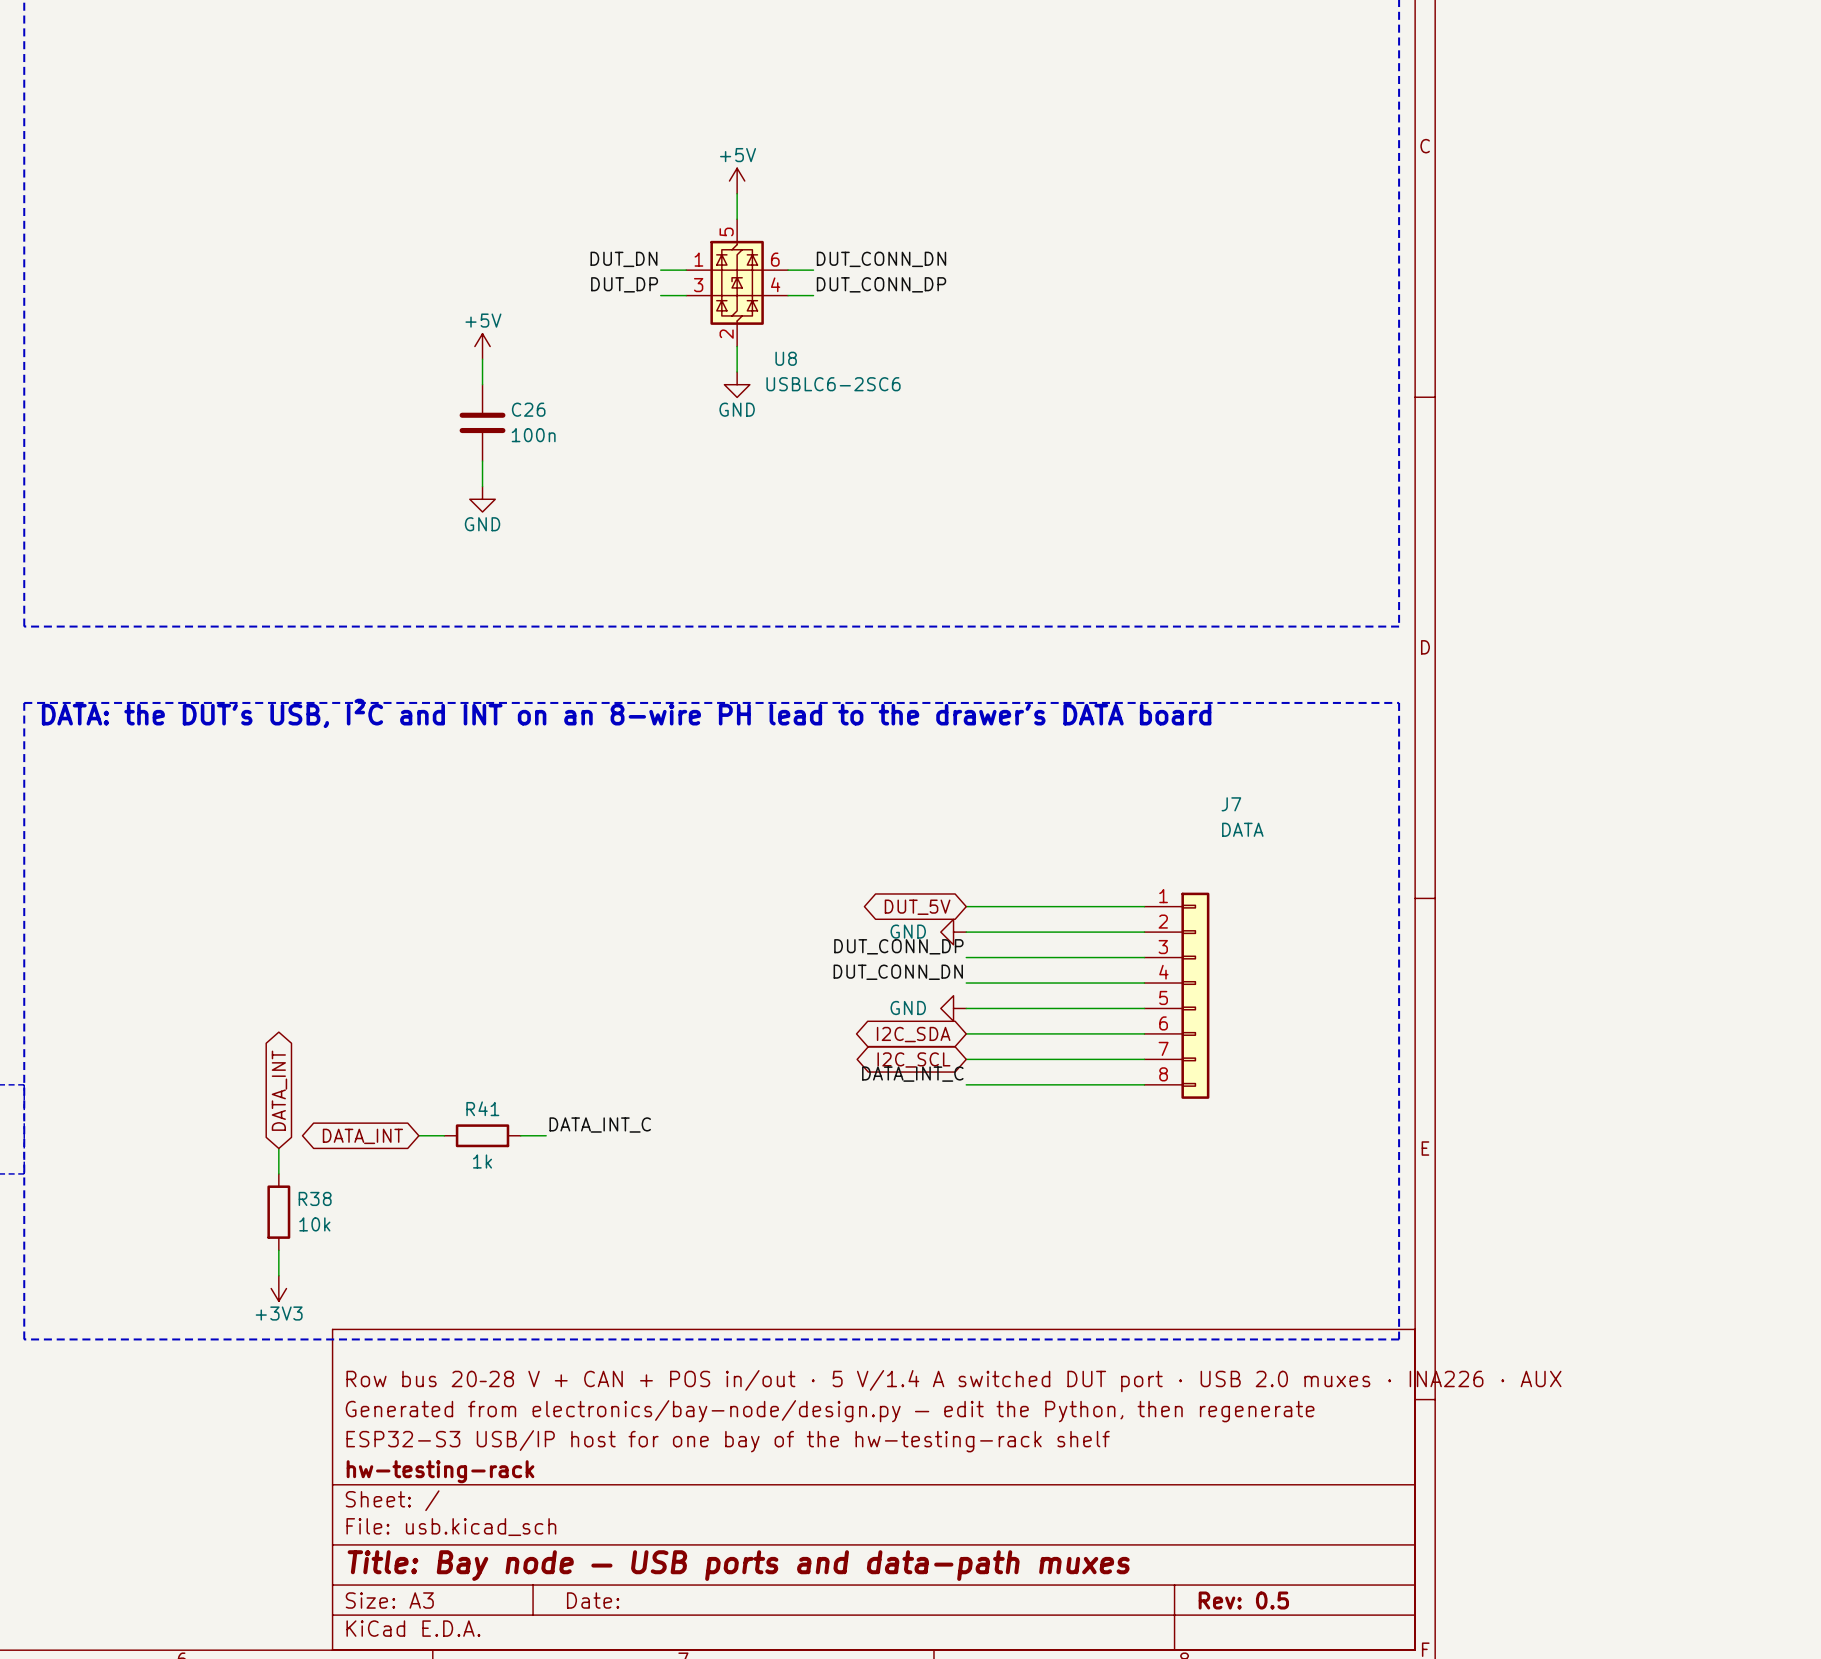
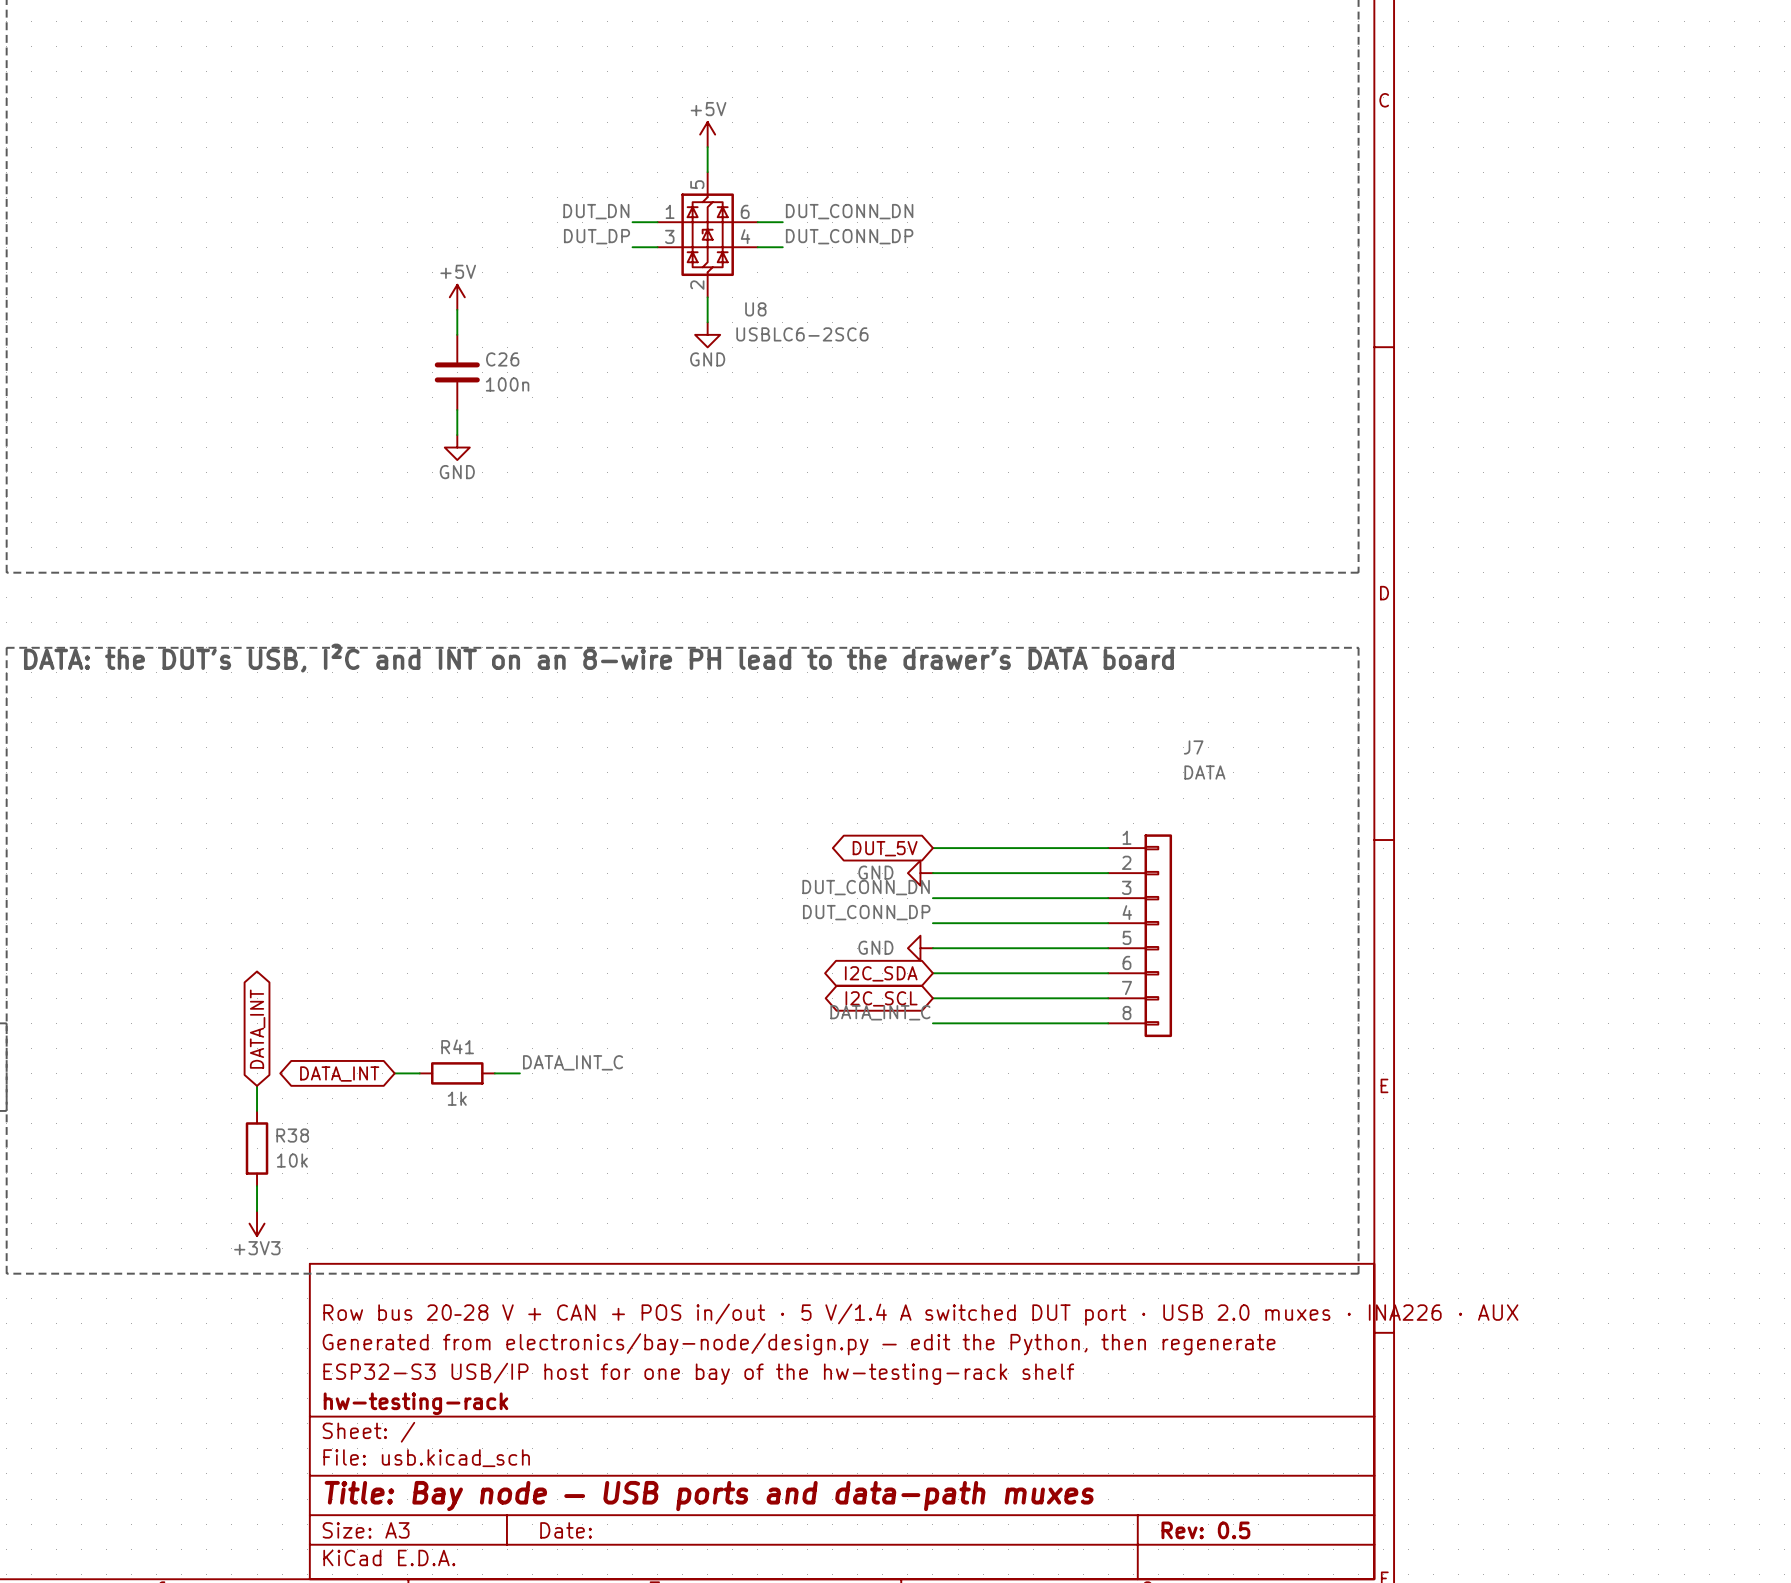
label: DUT_CONN_DP (898, 946) -> DUT_CONN_DN (866, 887)
label: DUT_CONN_DN (898, 972) -> DUT_CONN_DP (866, 912)

